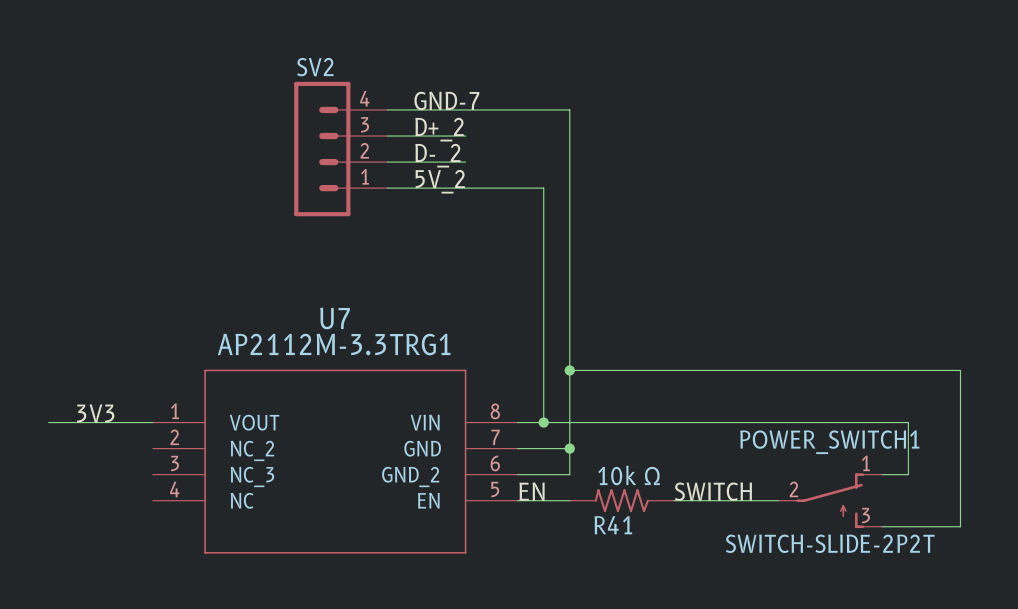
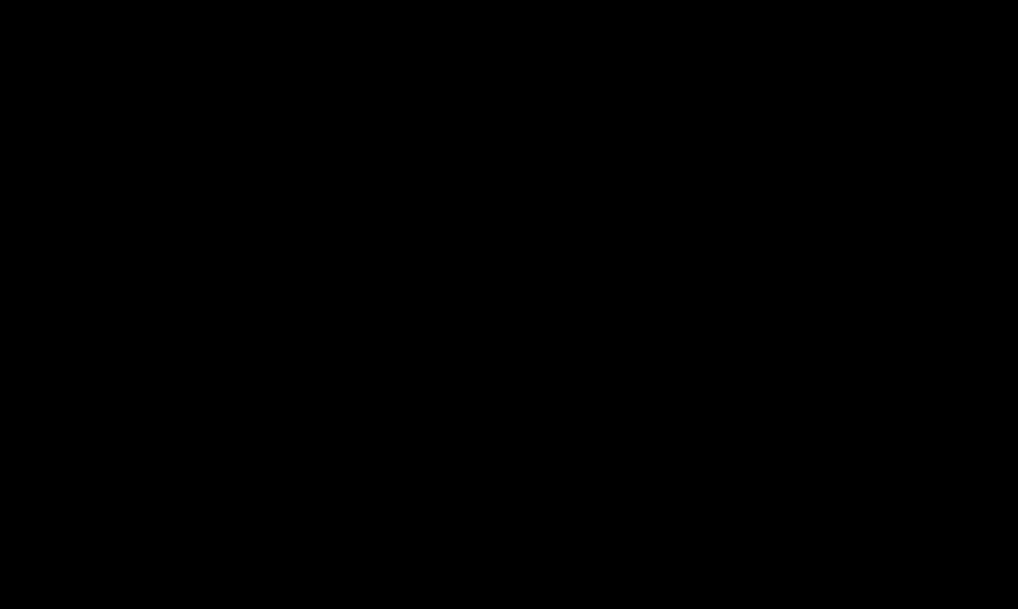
label: GND-7 (446, 100) -> none
wire: (387, 109) (569, 109) (569, 474) (517, 474) -> none
label: D+_2 (439, 129) -> none
wire: (387, 136) (465, 136) -> none
SV2: (340, 149) -> none
label: D-_2 (437, 155) -> none
wire: (387, 162) (465, 162) -> none
label: 5V_2 (440, 181) -> none
wire: (387, 188) (543, 188) (543, 422) -> none
wire: (569, 370) (960, 370) (960, 526) (882, 526) -> none
junction: (569, 370) -> none
label: 3V3 (95, 413) -> none
wire: (48, 422) (152, 422) -> none
wire: (517, 422) (908, 422) (908, 474) (882, 474) -> none
junction: (543, 422) -> none
wire: (517, 448) (569, 448) -> none
junction: (569, 448) -> none
U7: AP2112M-3.3TRG1 (335, 461) -> none
label: EN (532, 491) -> none
label: SWITCH (713, 491) -> none
wire: (517, 500) (569, 500) -> none
R41: 10k Ω (621, 500) -> none
wire: (673, 500) (778, 500) -> none
POWER_SWITCH1: SWITCH-SLIDE-2P2T (830, 500) -> none

